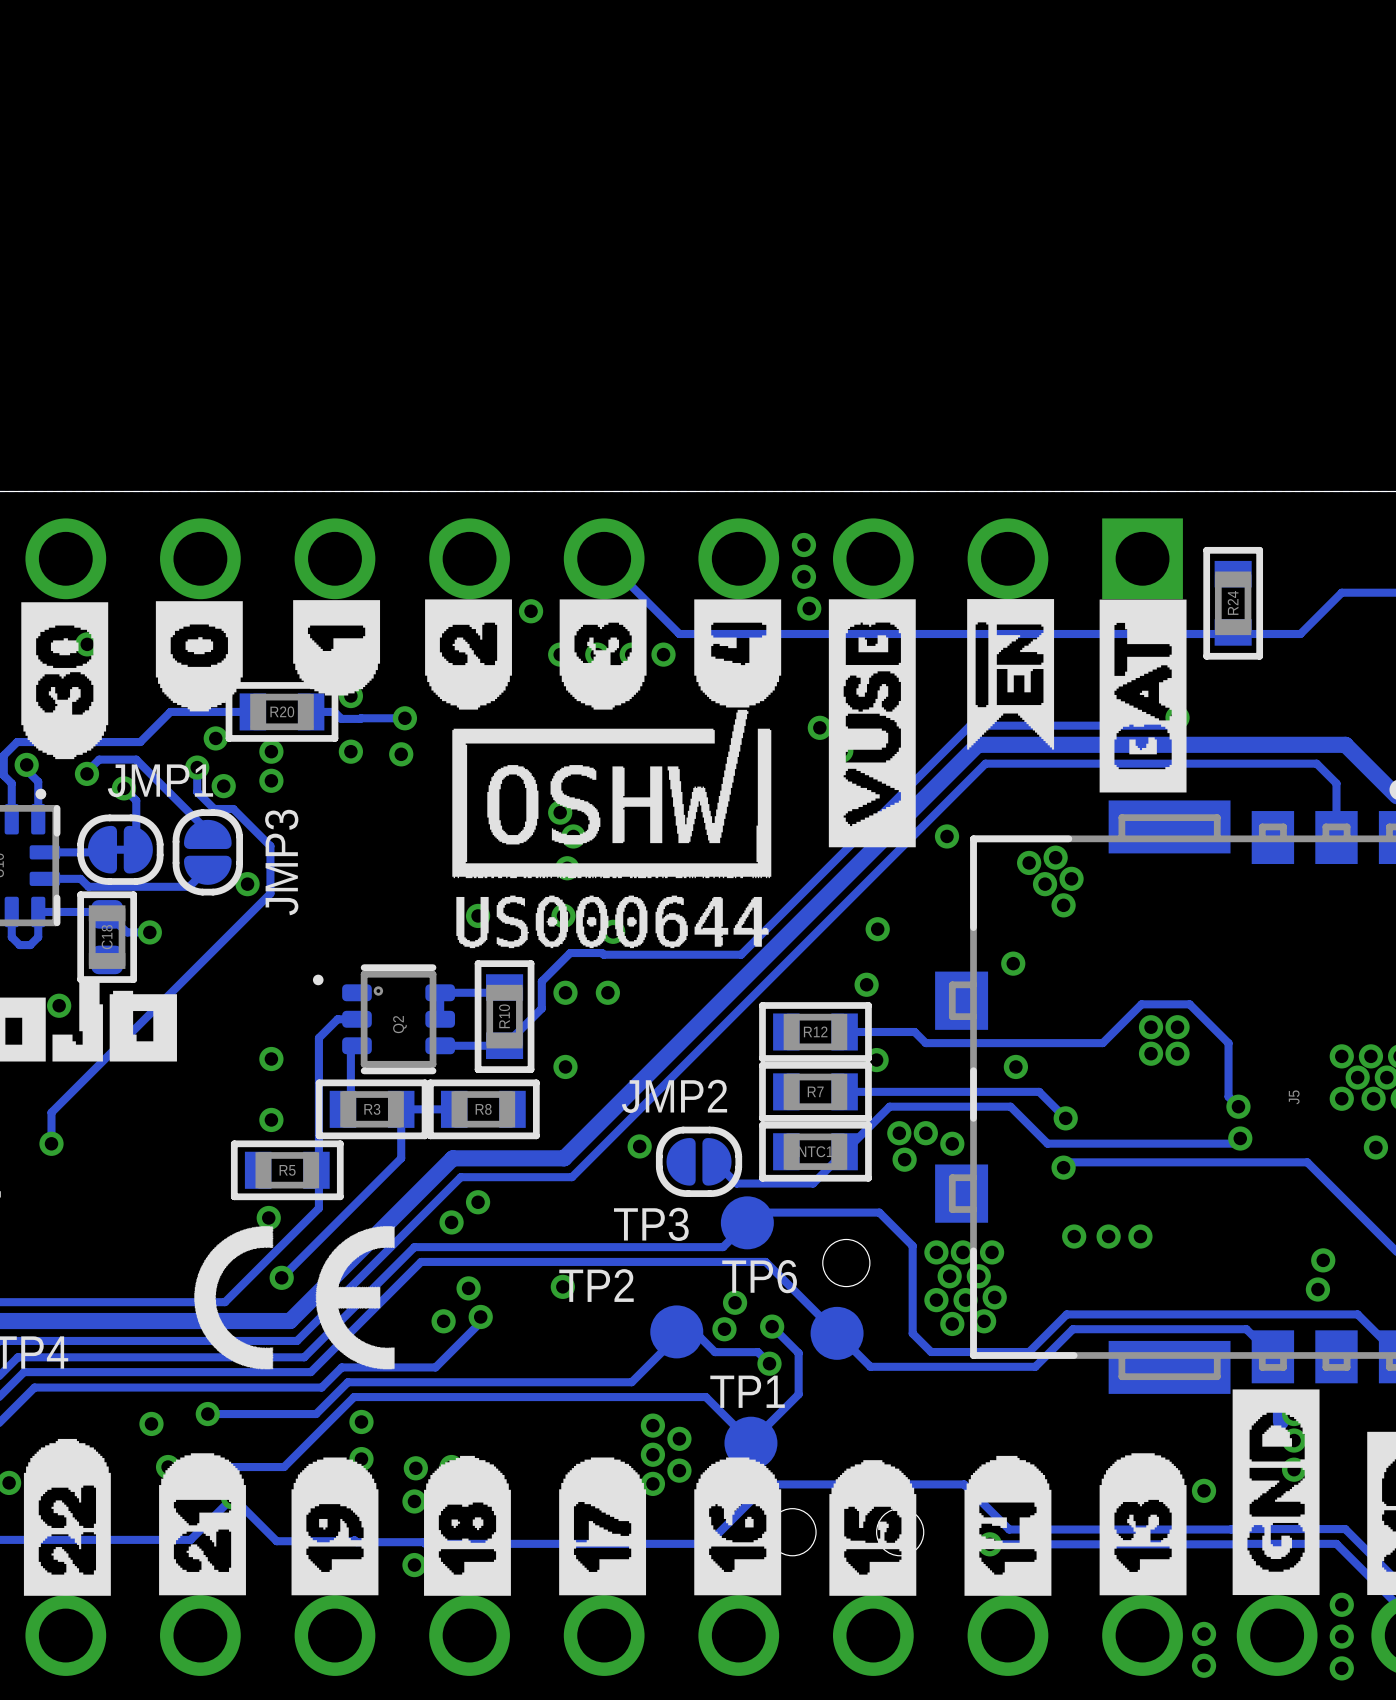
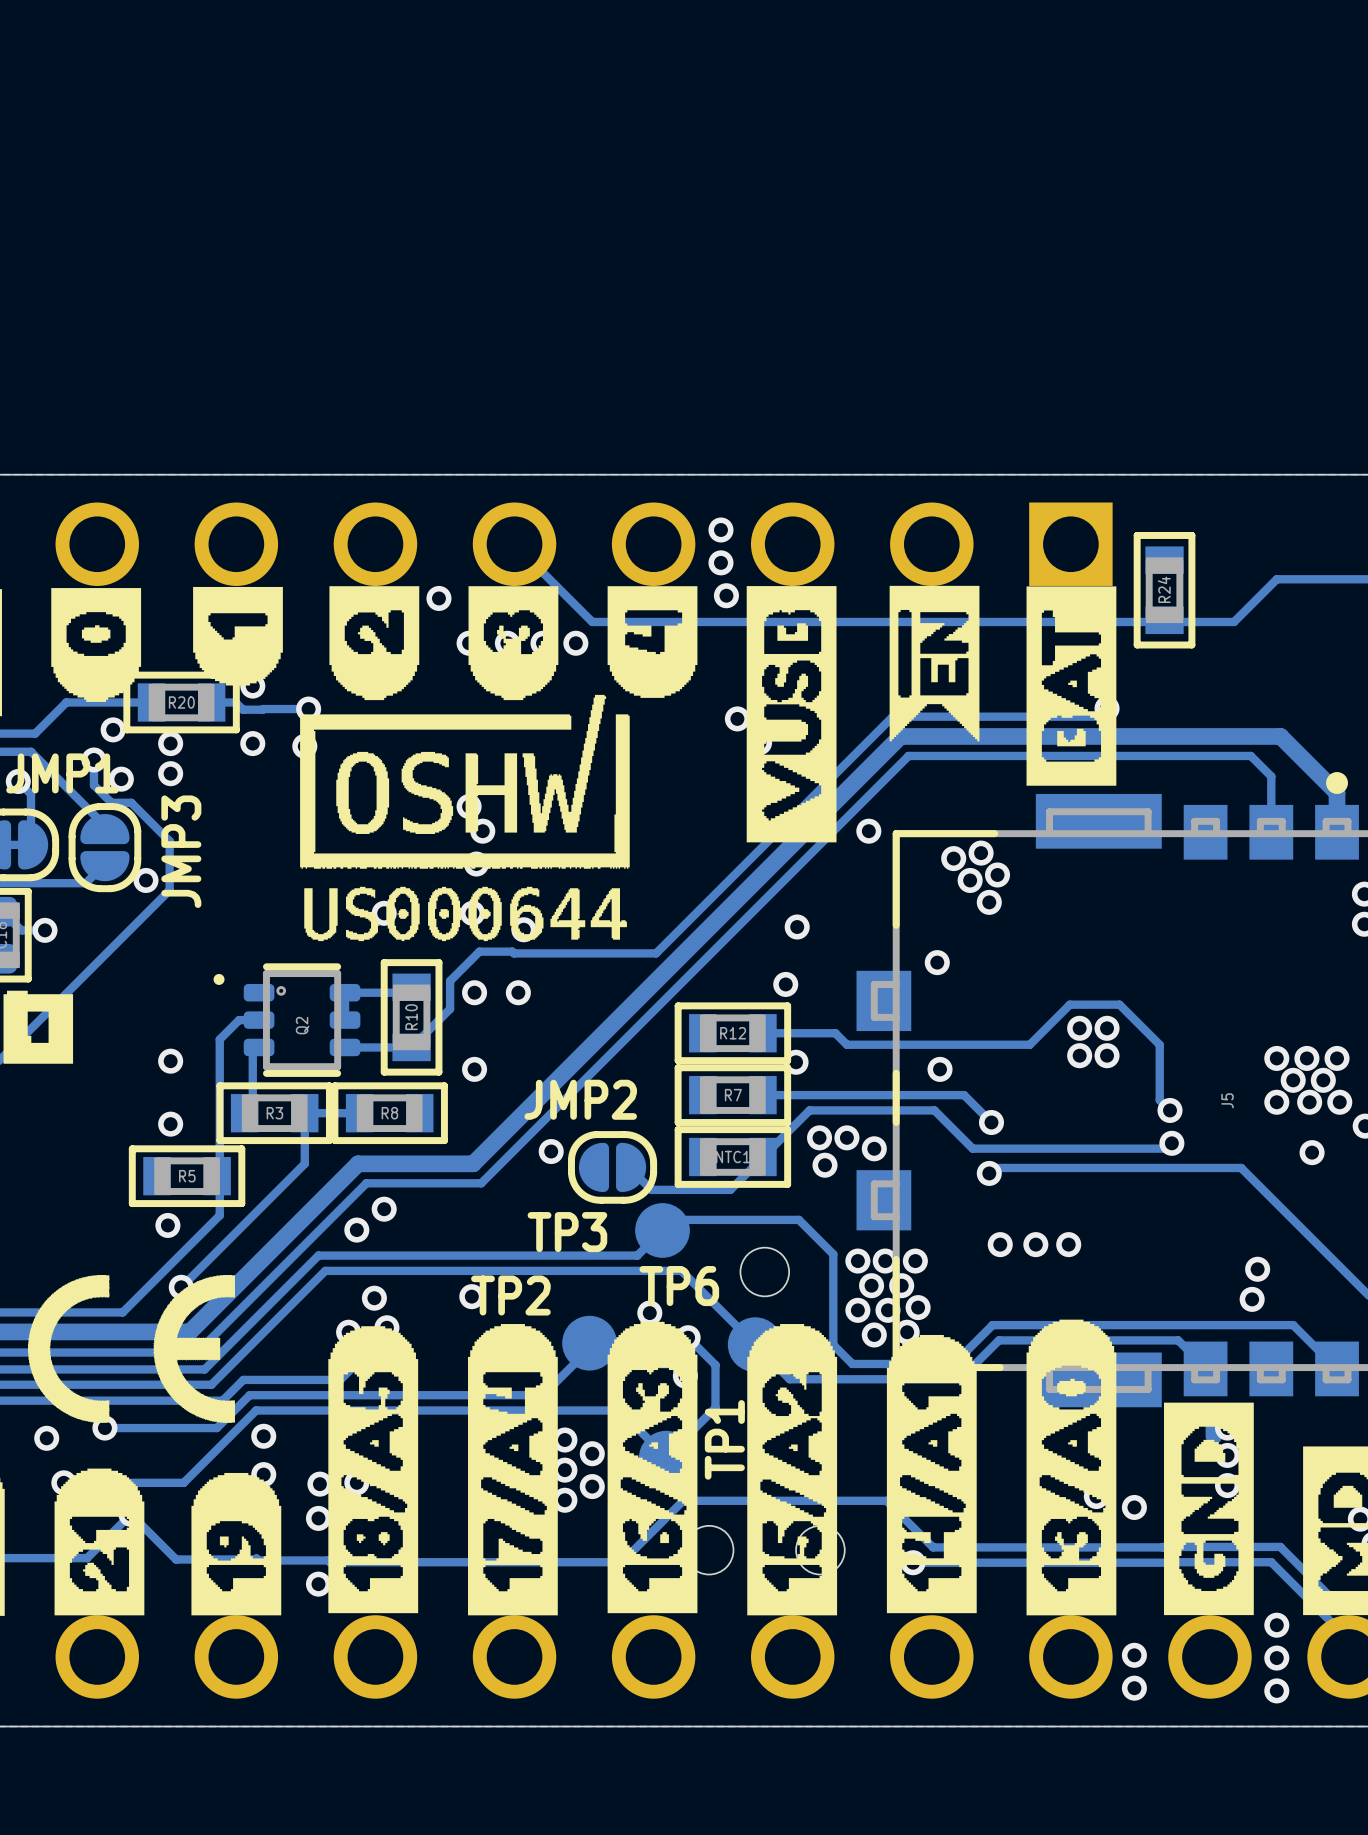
drawing position: (611, 828) -> (464, 817)
drawing position: (294, 1297) -> (131, 1348)
drawing: none -> [328, 1319, 1117, 1616]
TP1 name rotation: 0° (747, 1391) -> 90° counterclockwise (724, 1439)
drawing: [424, 1453, 1187, 1596] -> none

